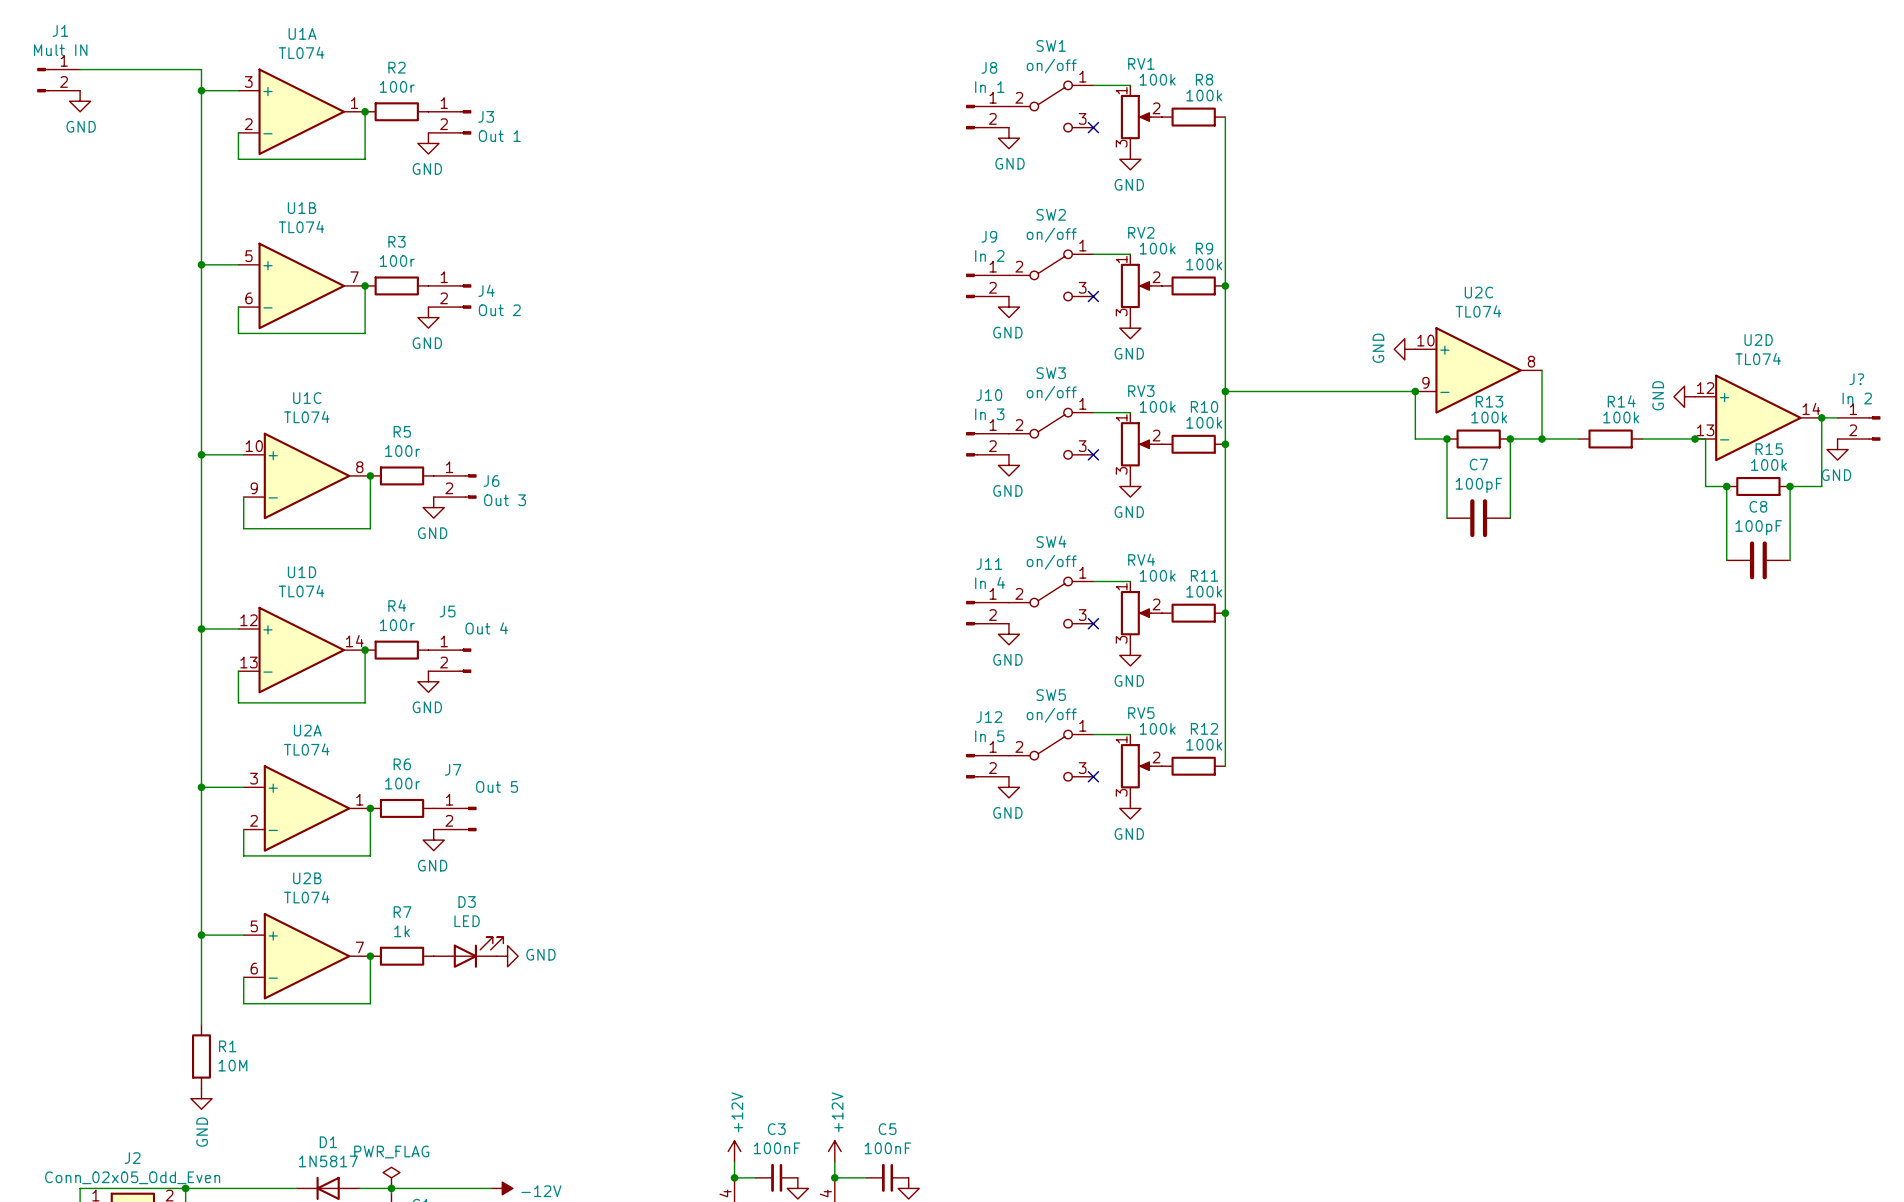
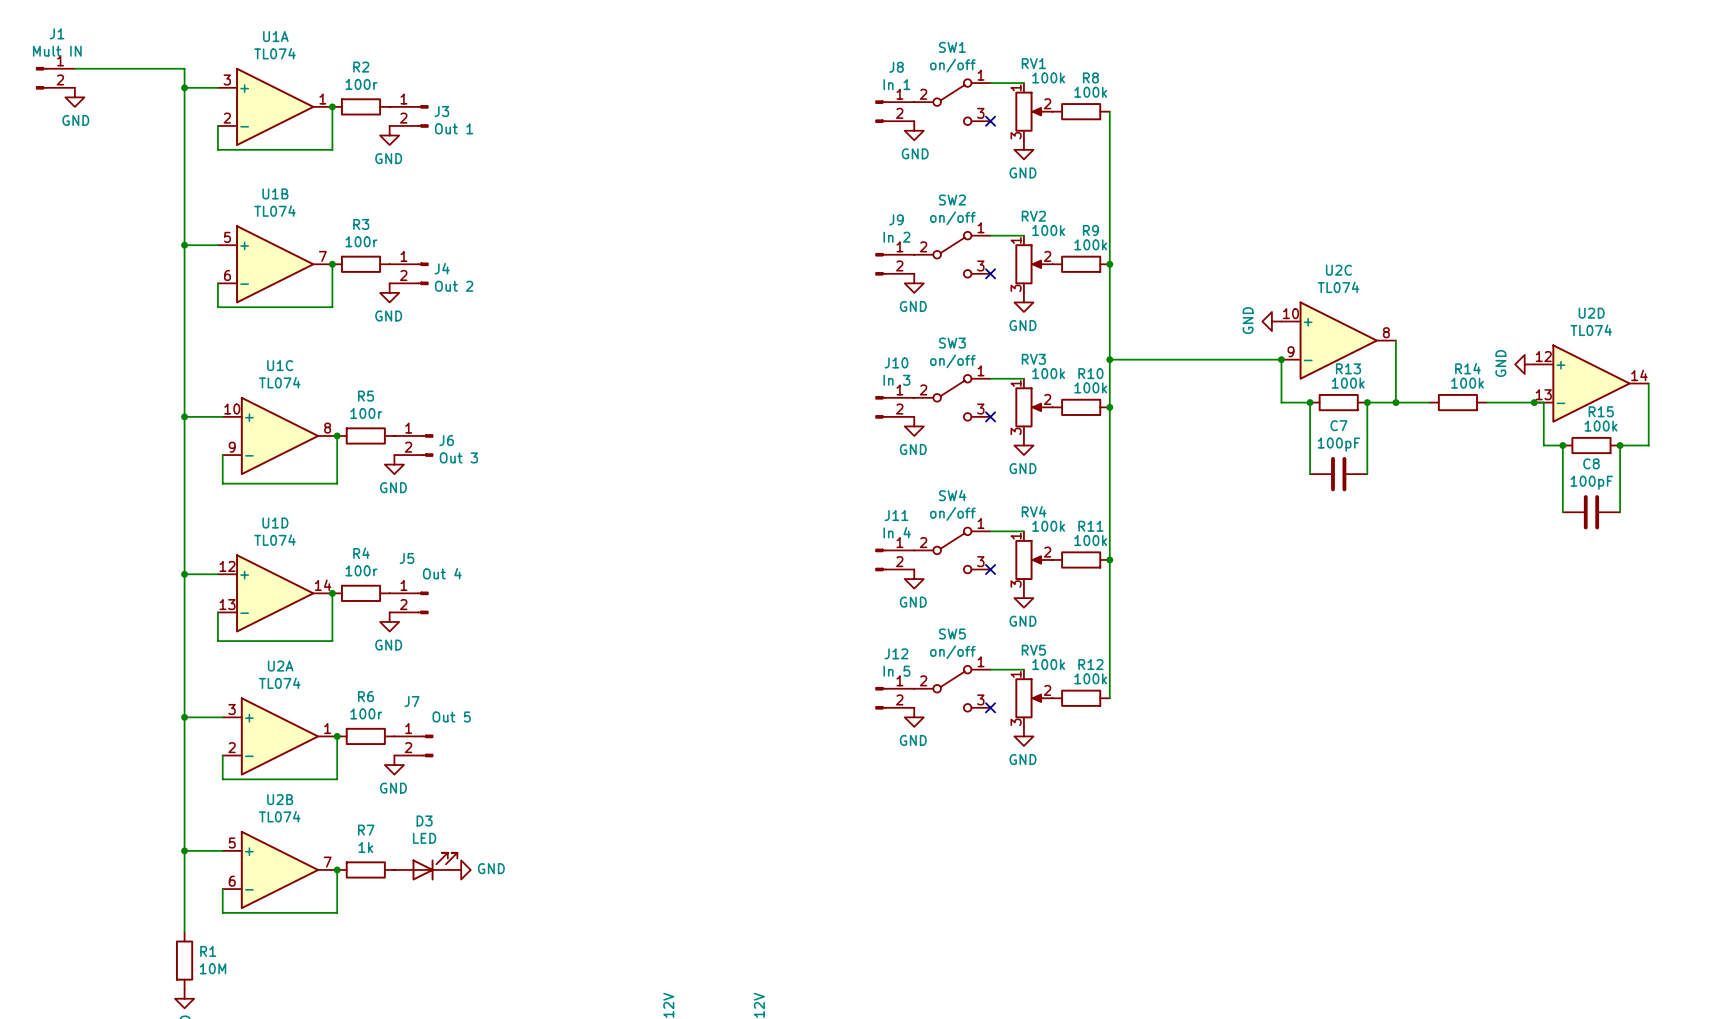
wire: (1821, 417) (1837, 417) -> none
junction: (1821, 417) -> none
J?: In 2 (1858, 428) -> none
power symbol: GND (1837, 449) -> none

